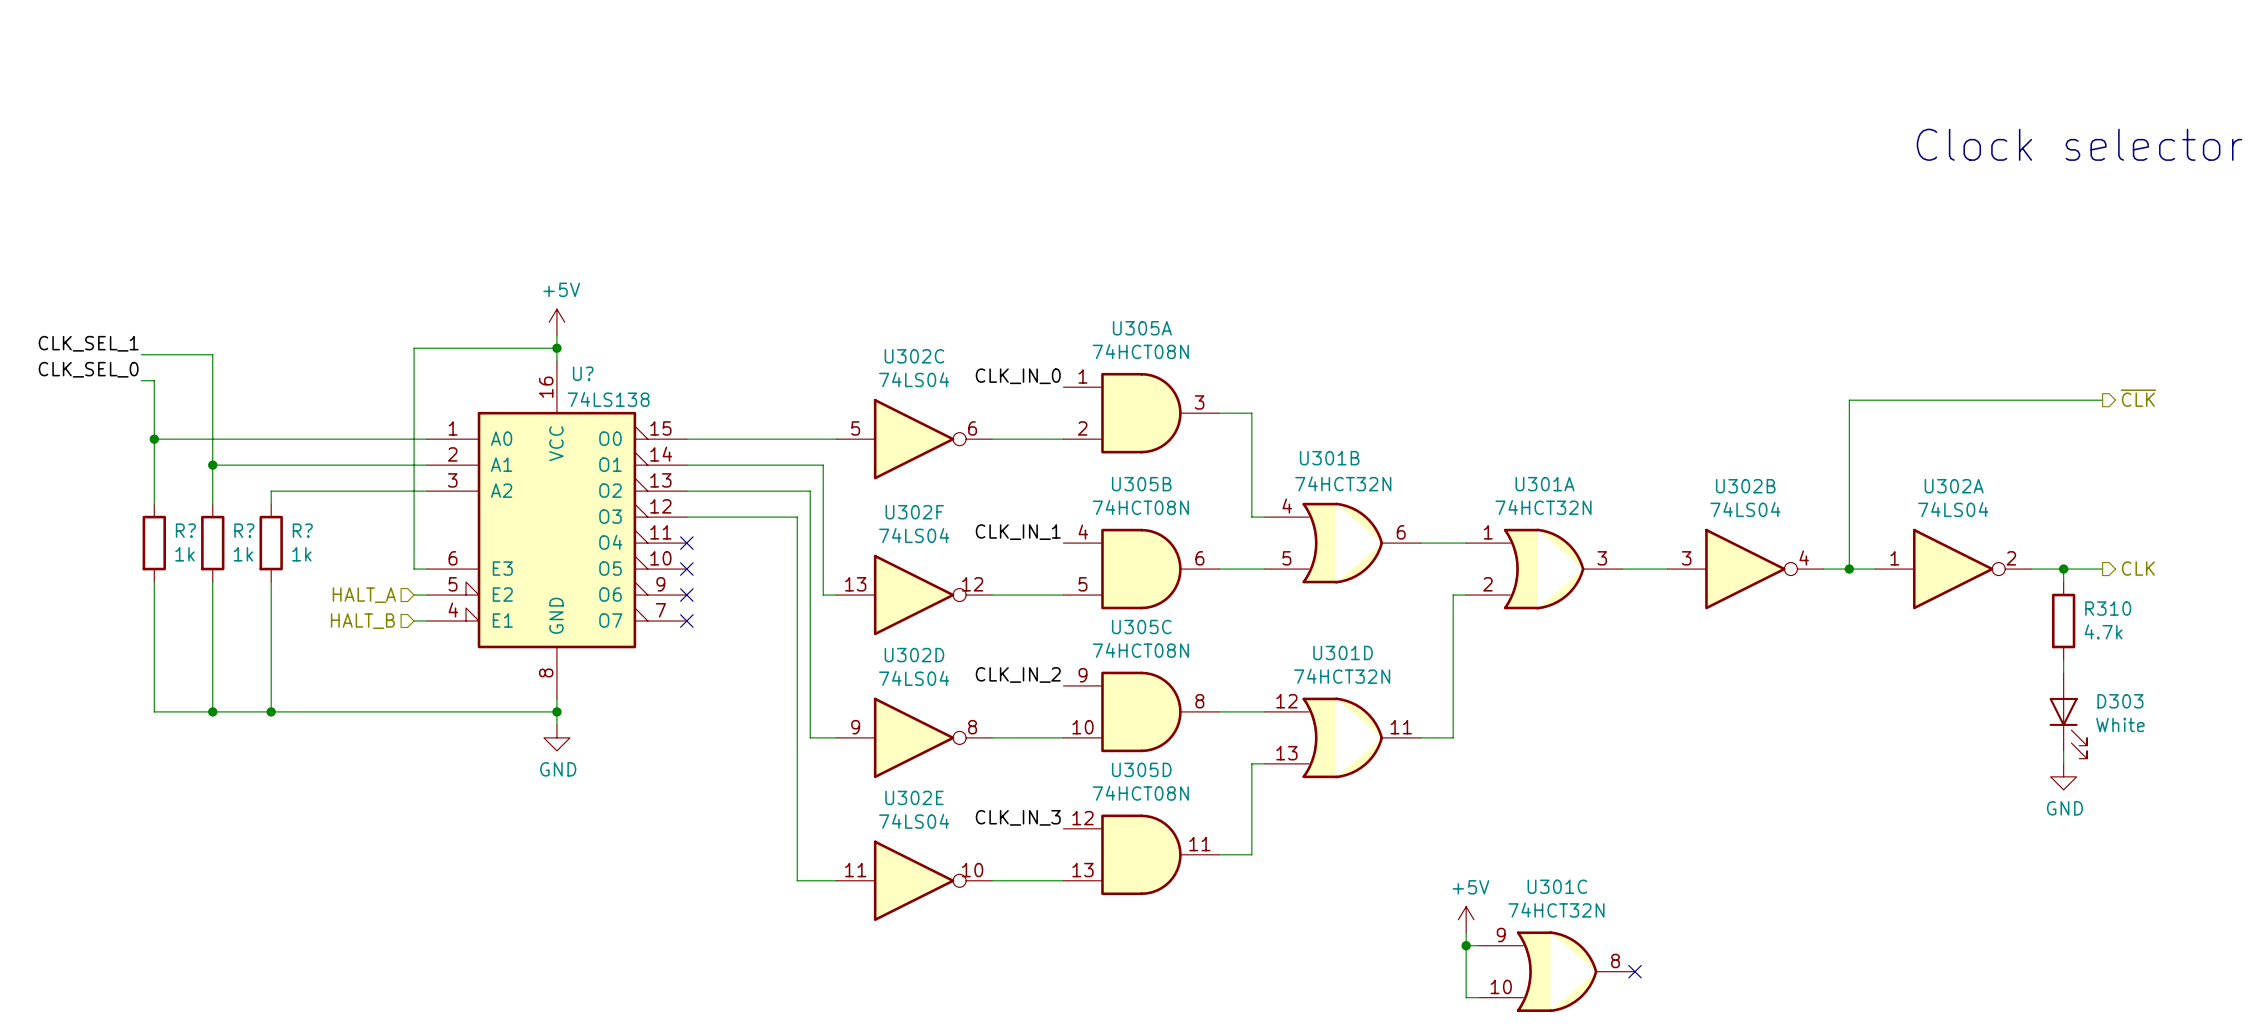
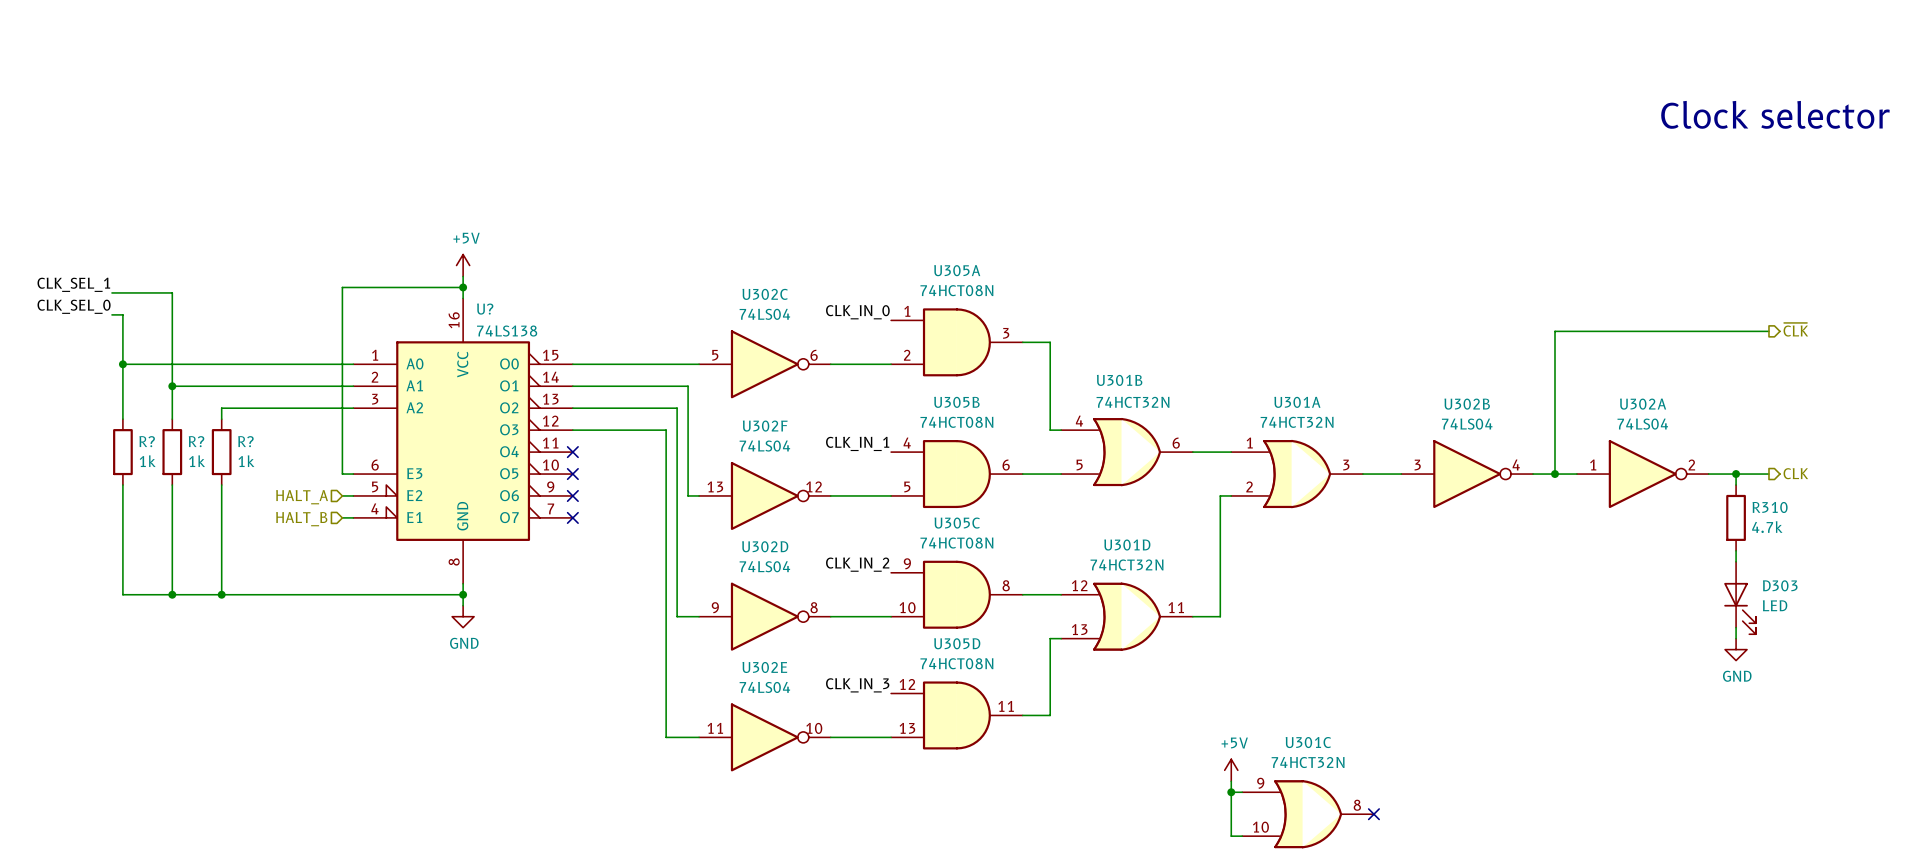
D303 value: White (2120, 724) -> LED (1775, 605)

